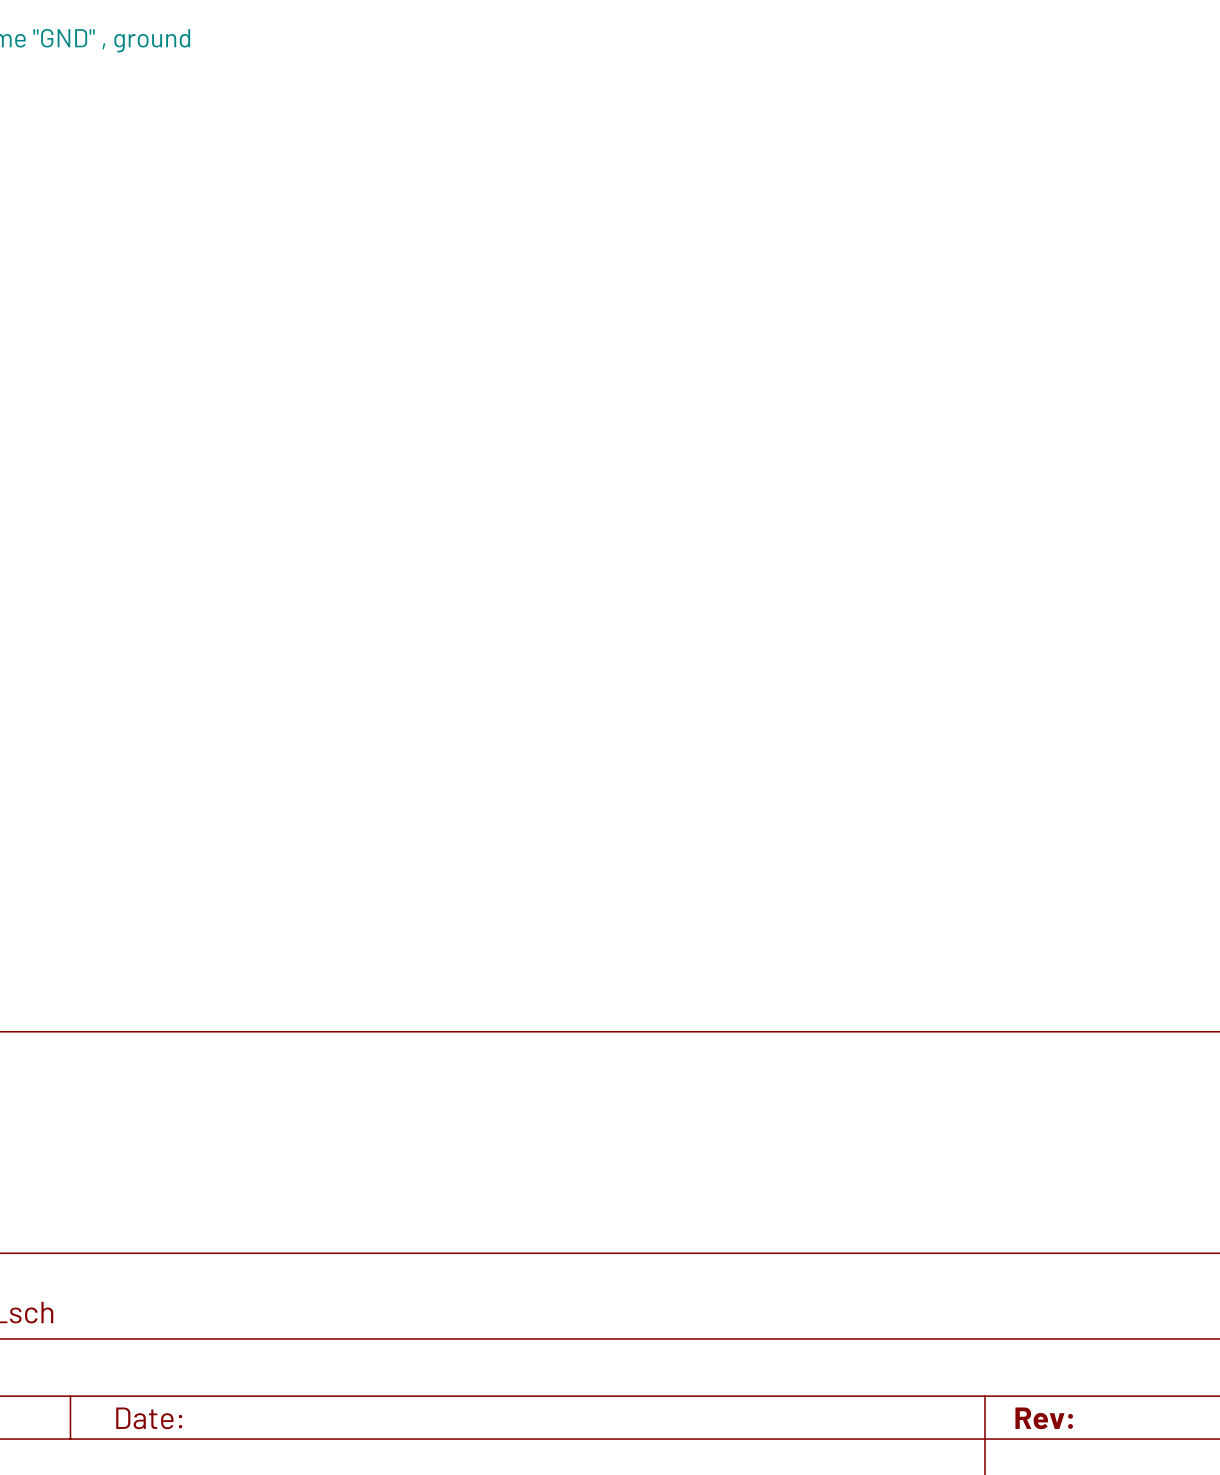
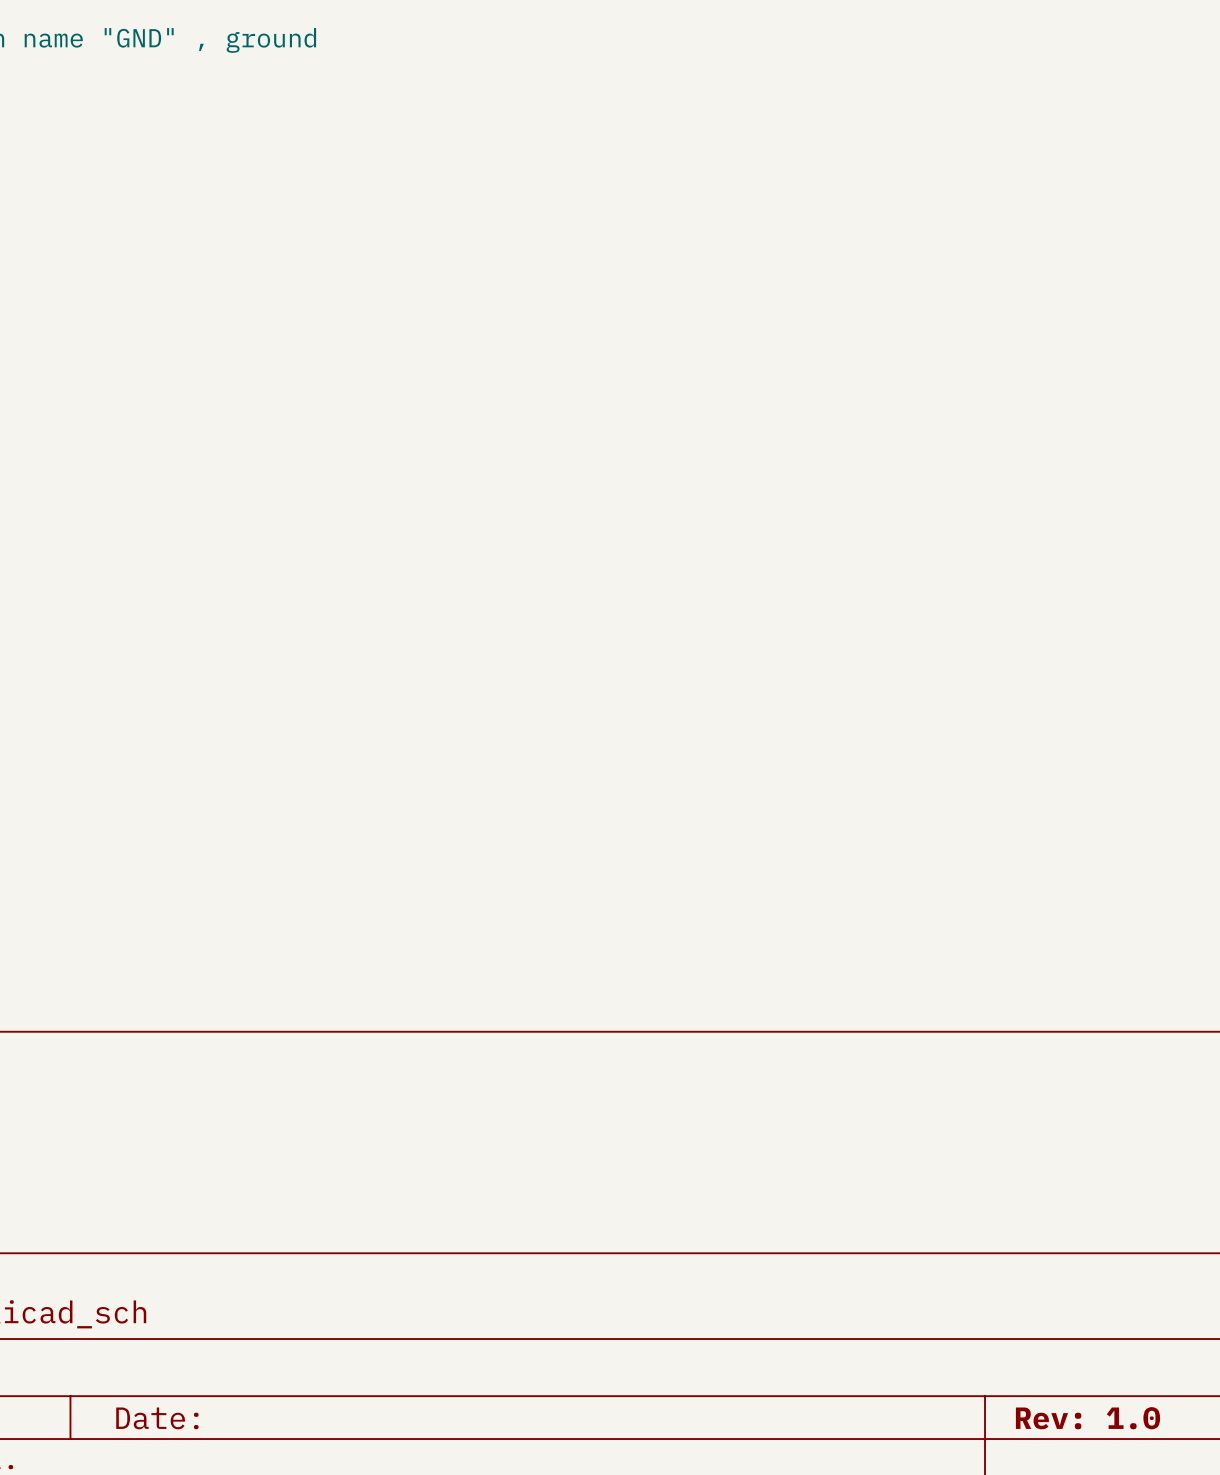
title block: Rev: (1044, 1418) -> Rev: 1.0 (1088, 1418)

